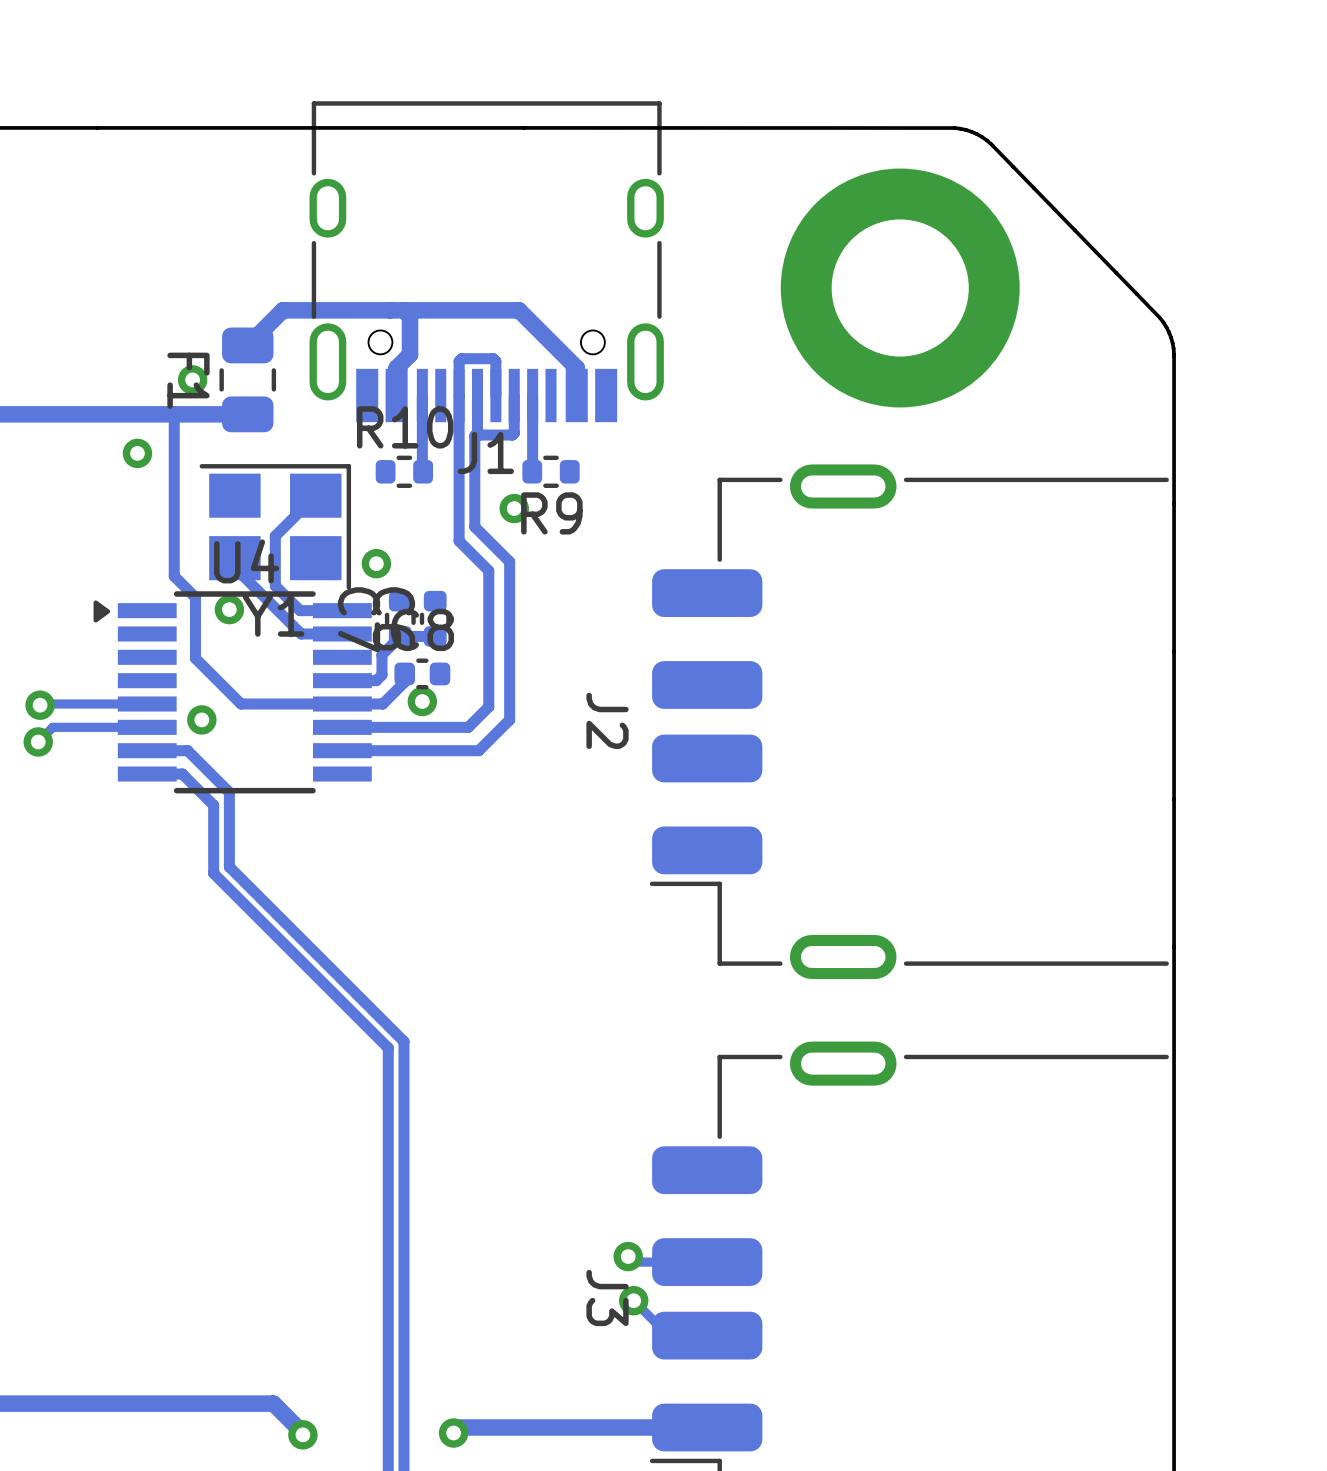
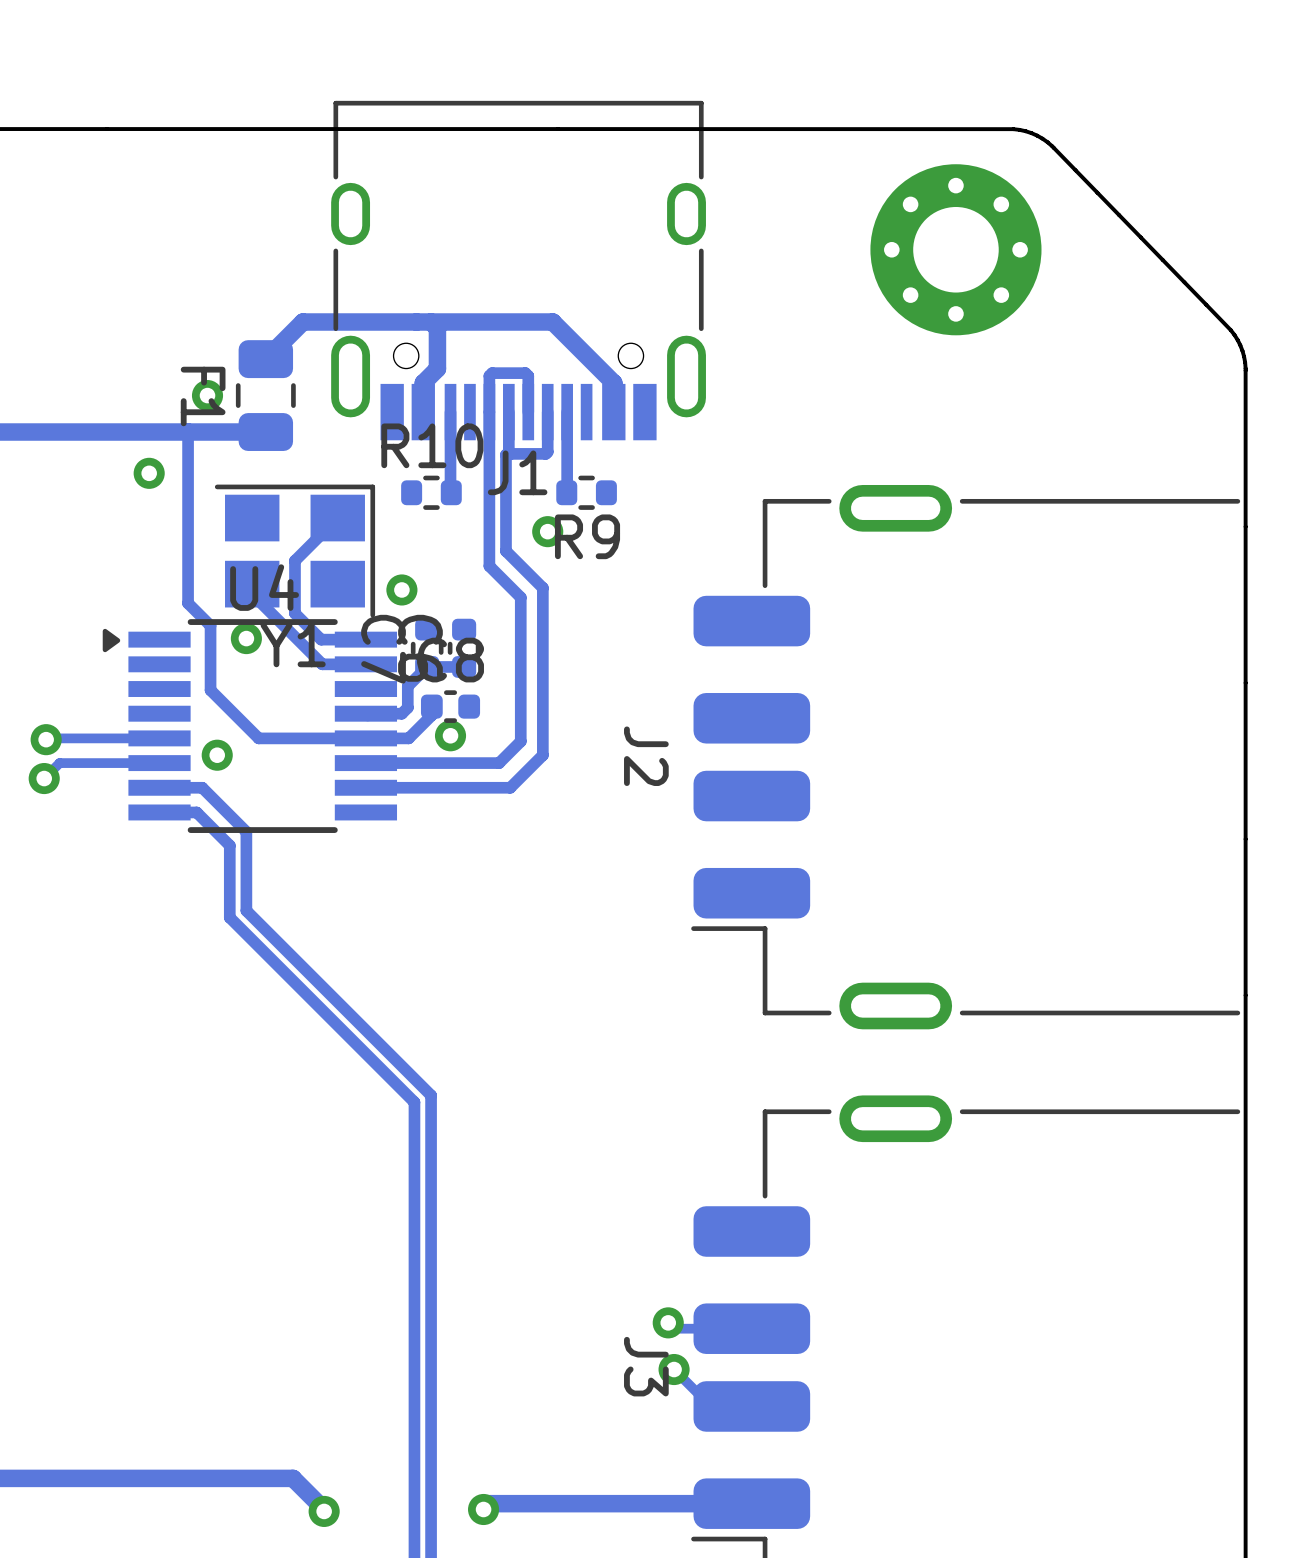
part: none -> (955, 249)
part: (900, 288) -> none

